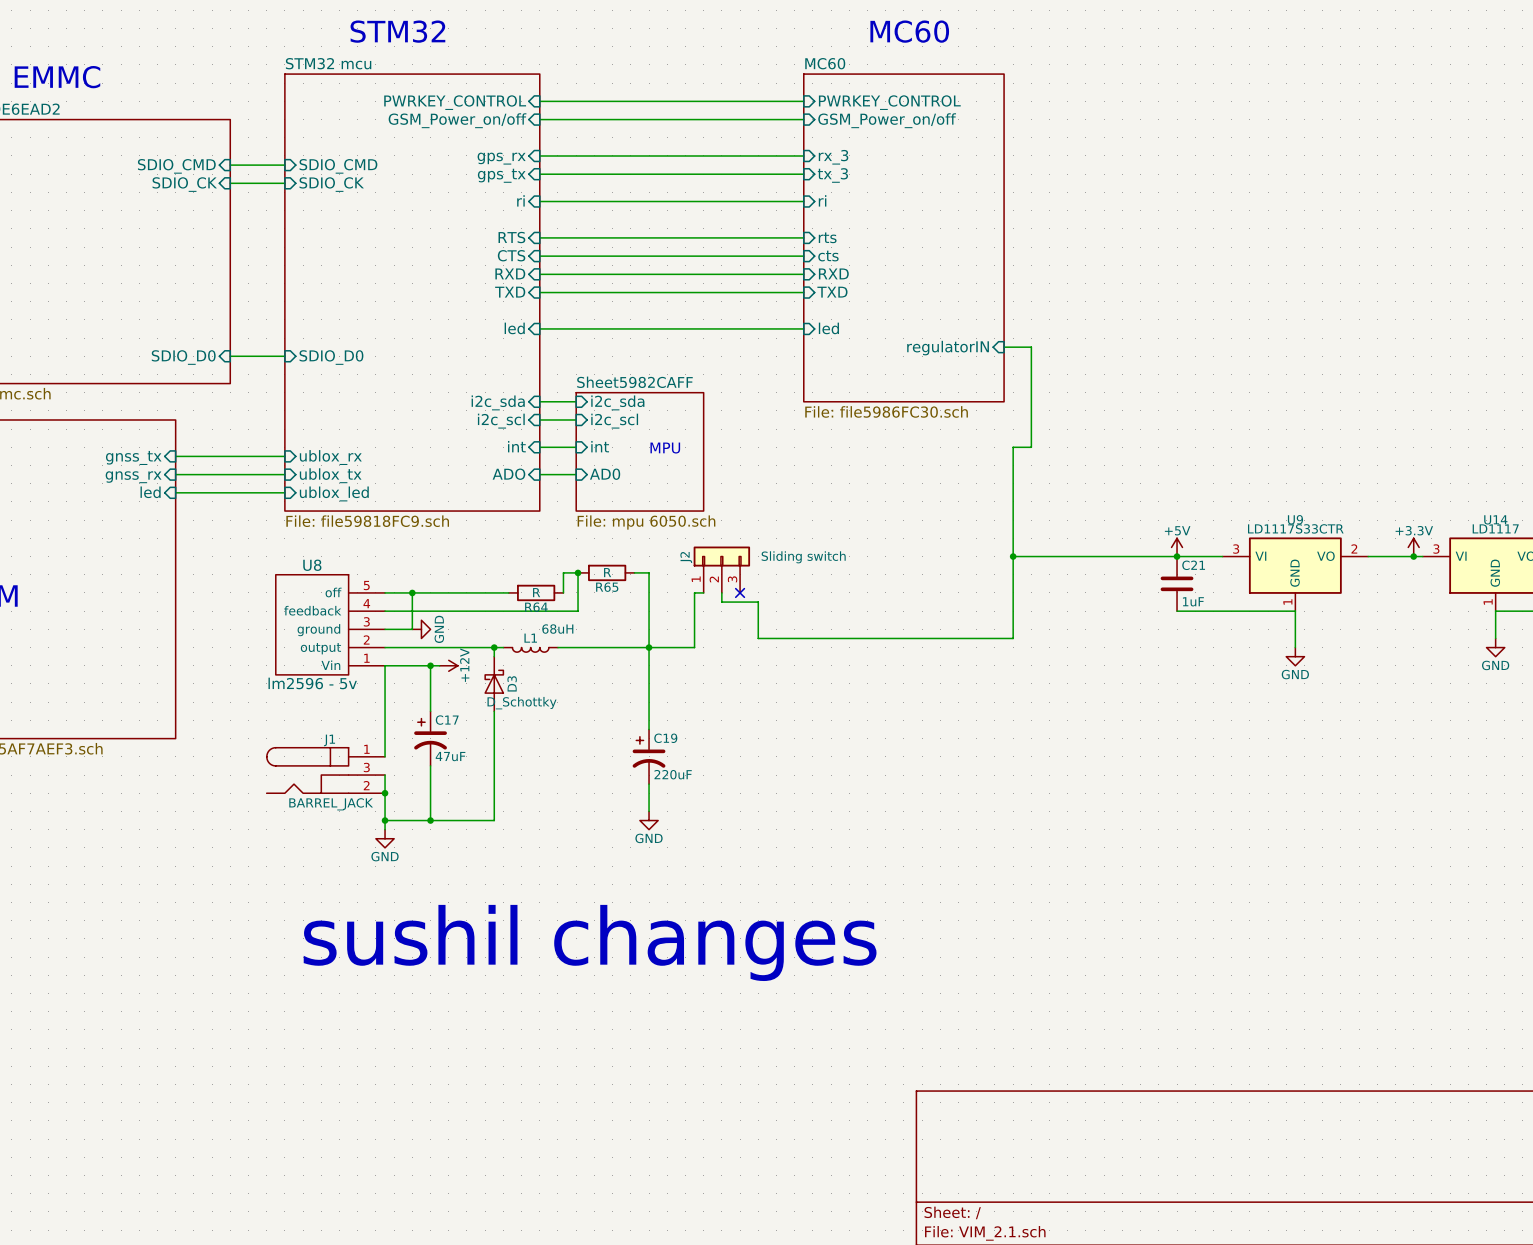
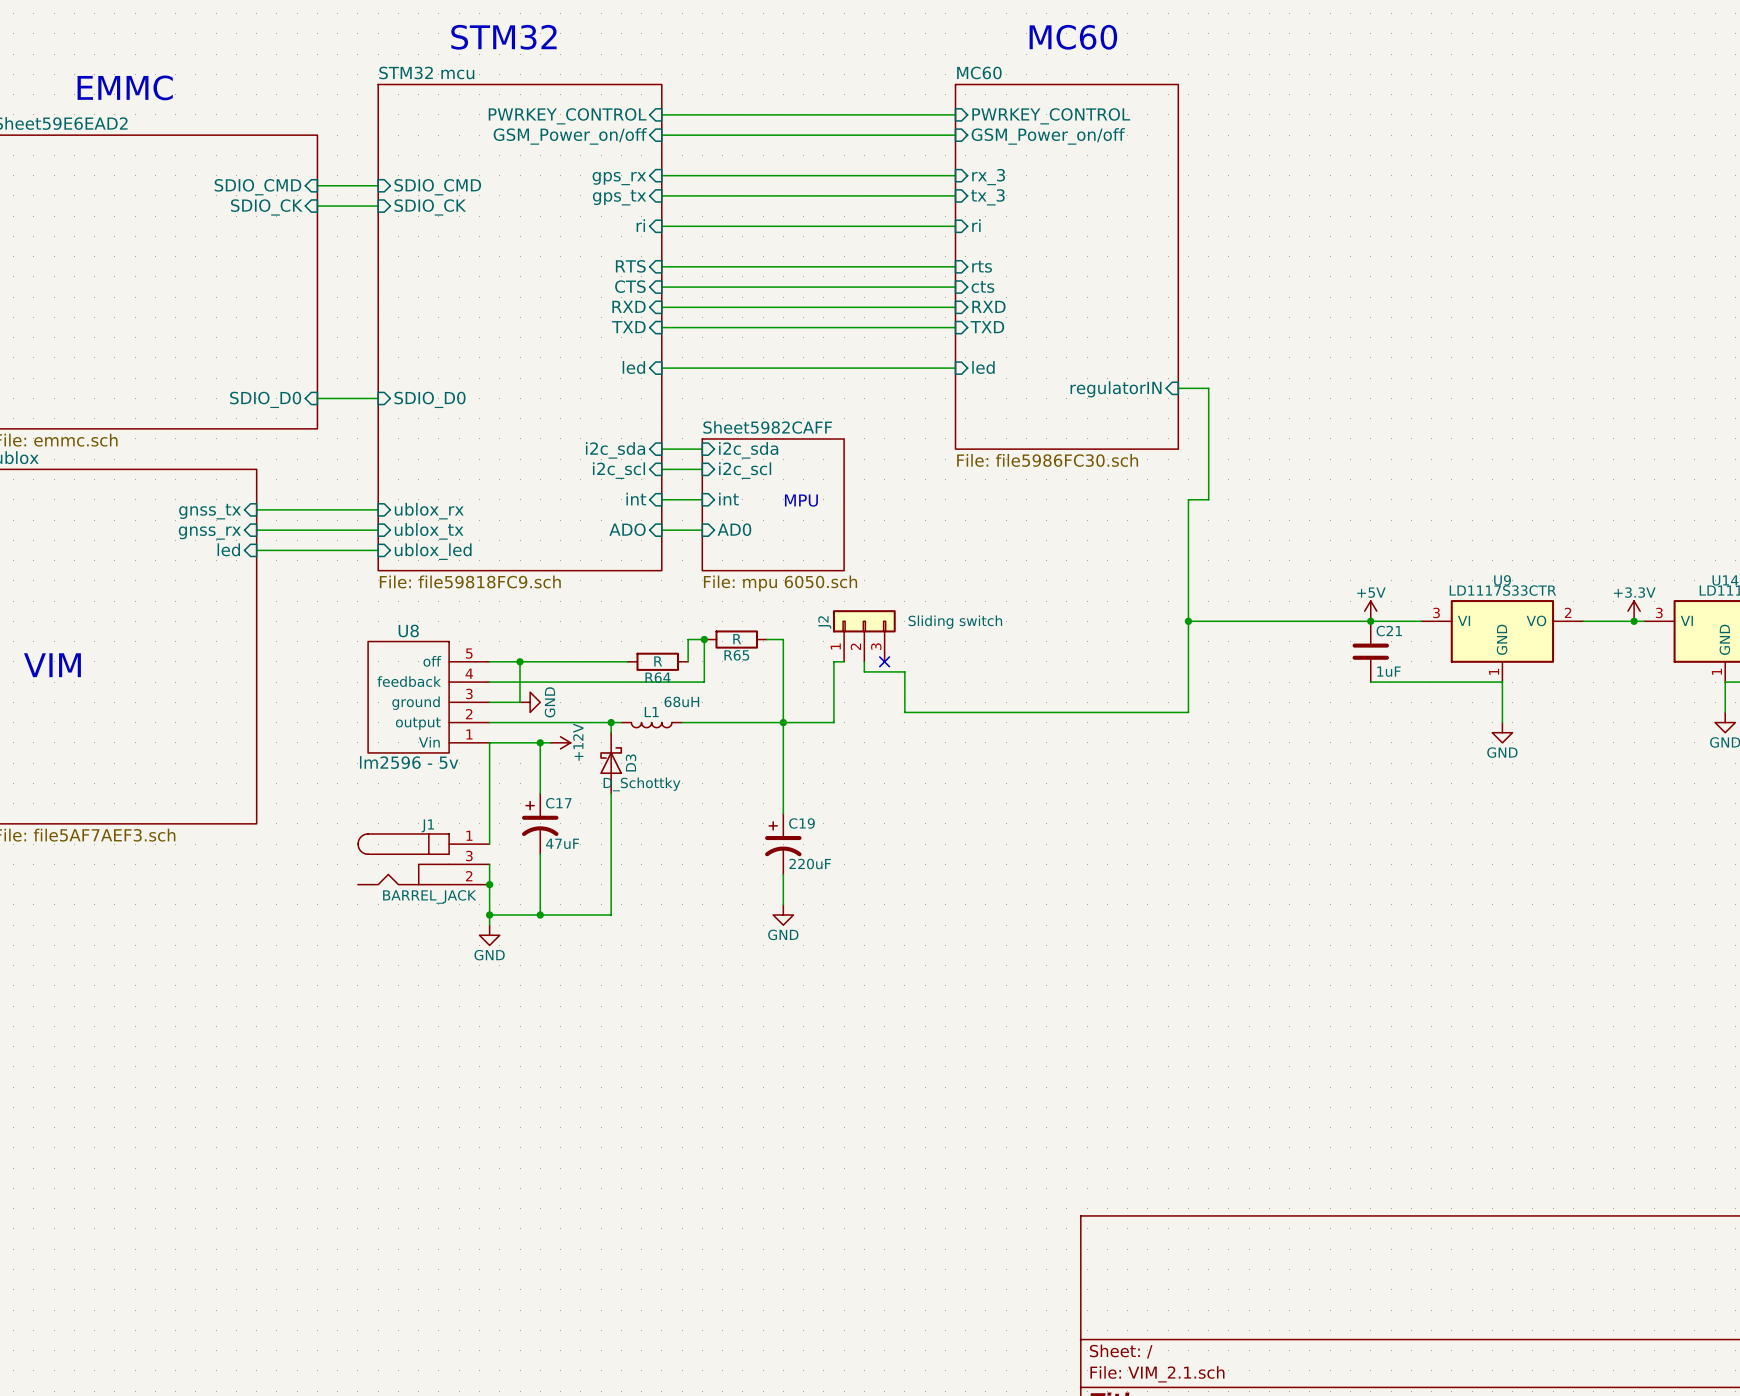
text: sushil changes (590, 942) -> none

